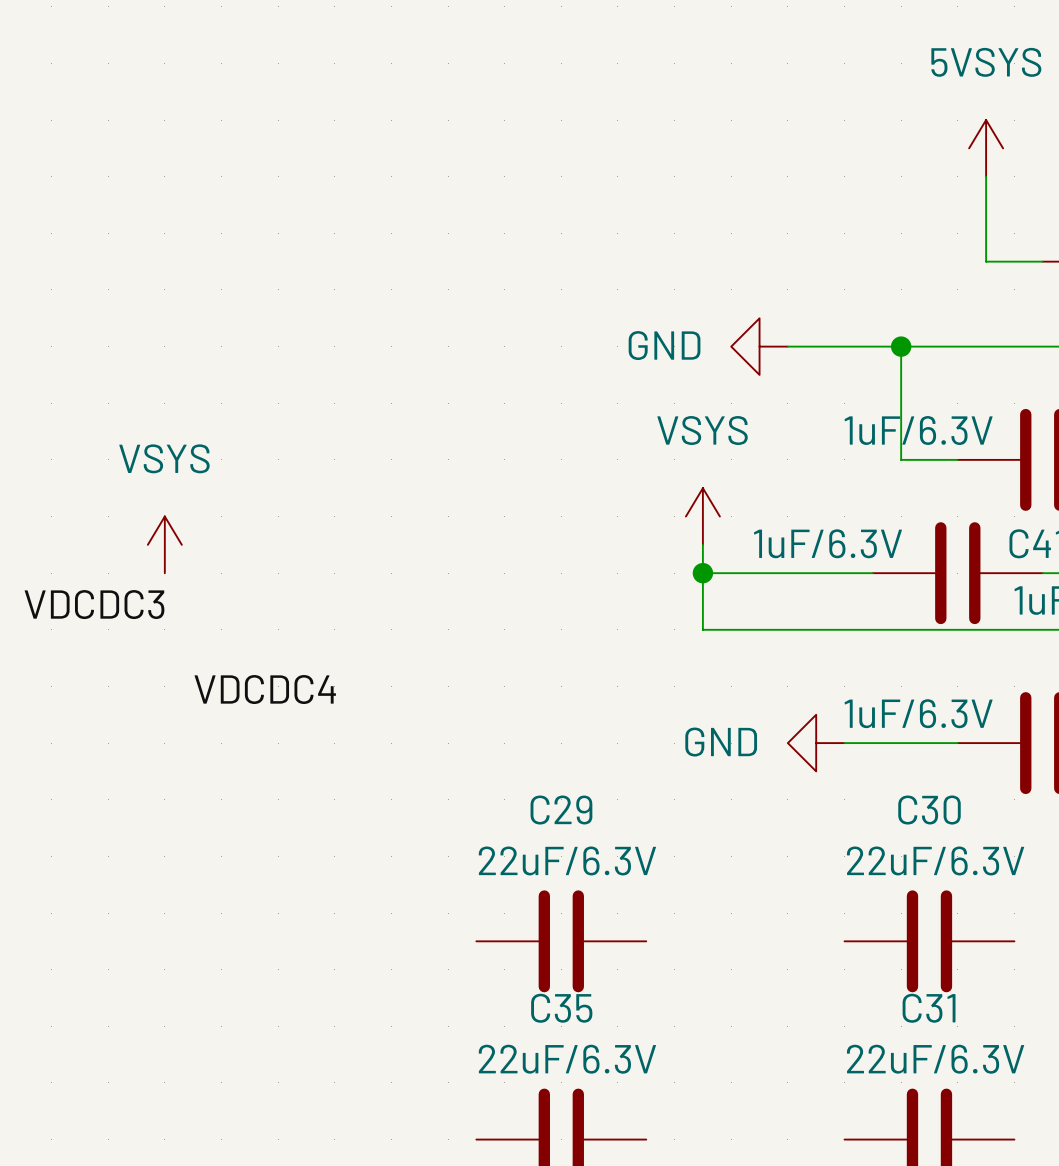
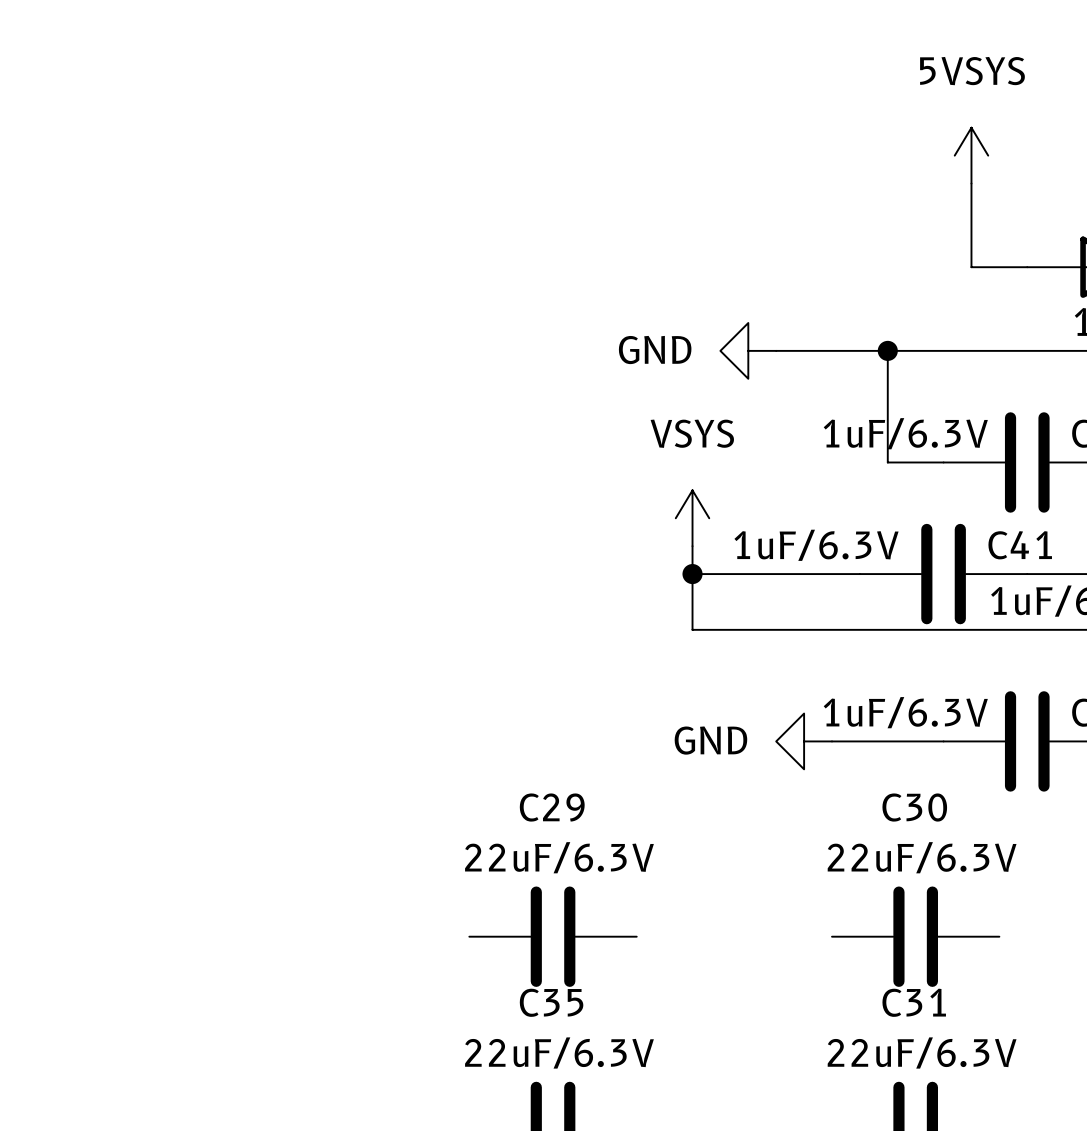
power symbol: VSYS (164, 544) -> none
label: VDCDC3 (94, 604) -> none
label: VDCDC4 (265, 689) -> none

